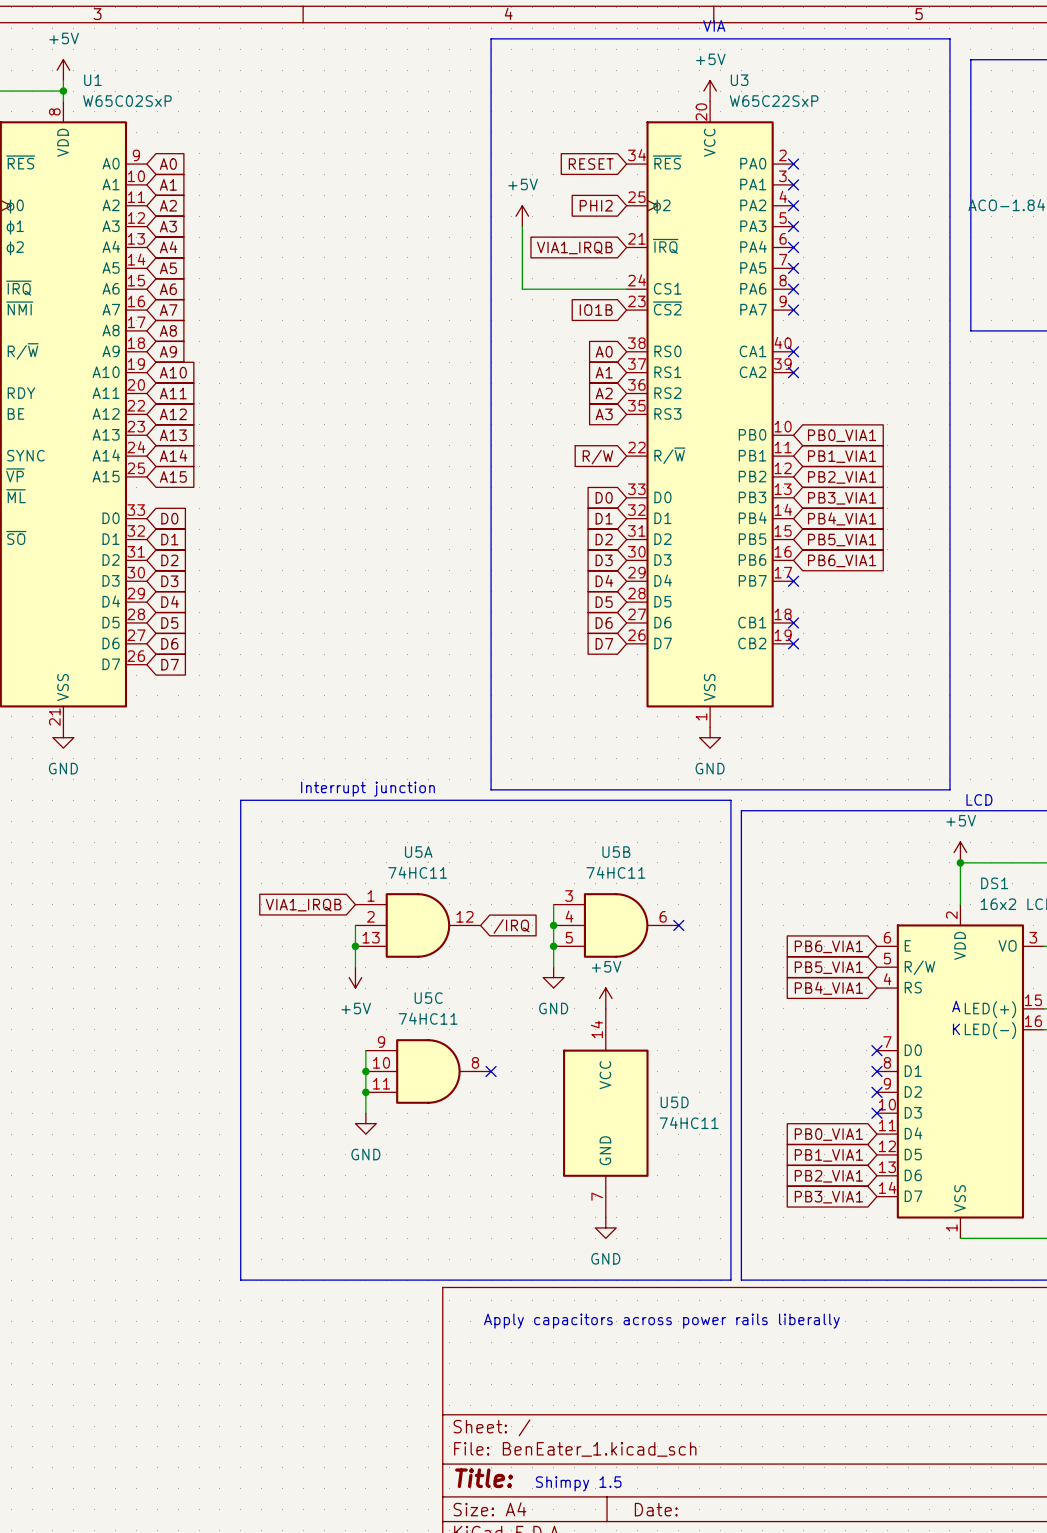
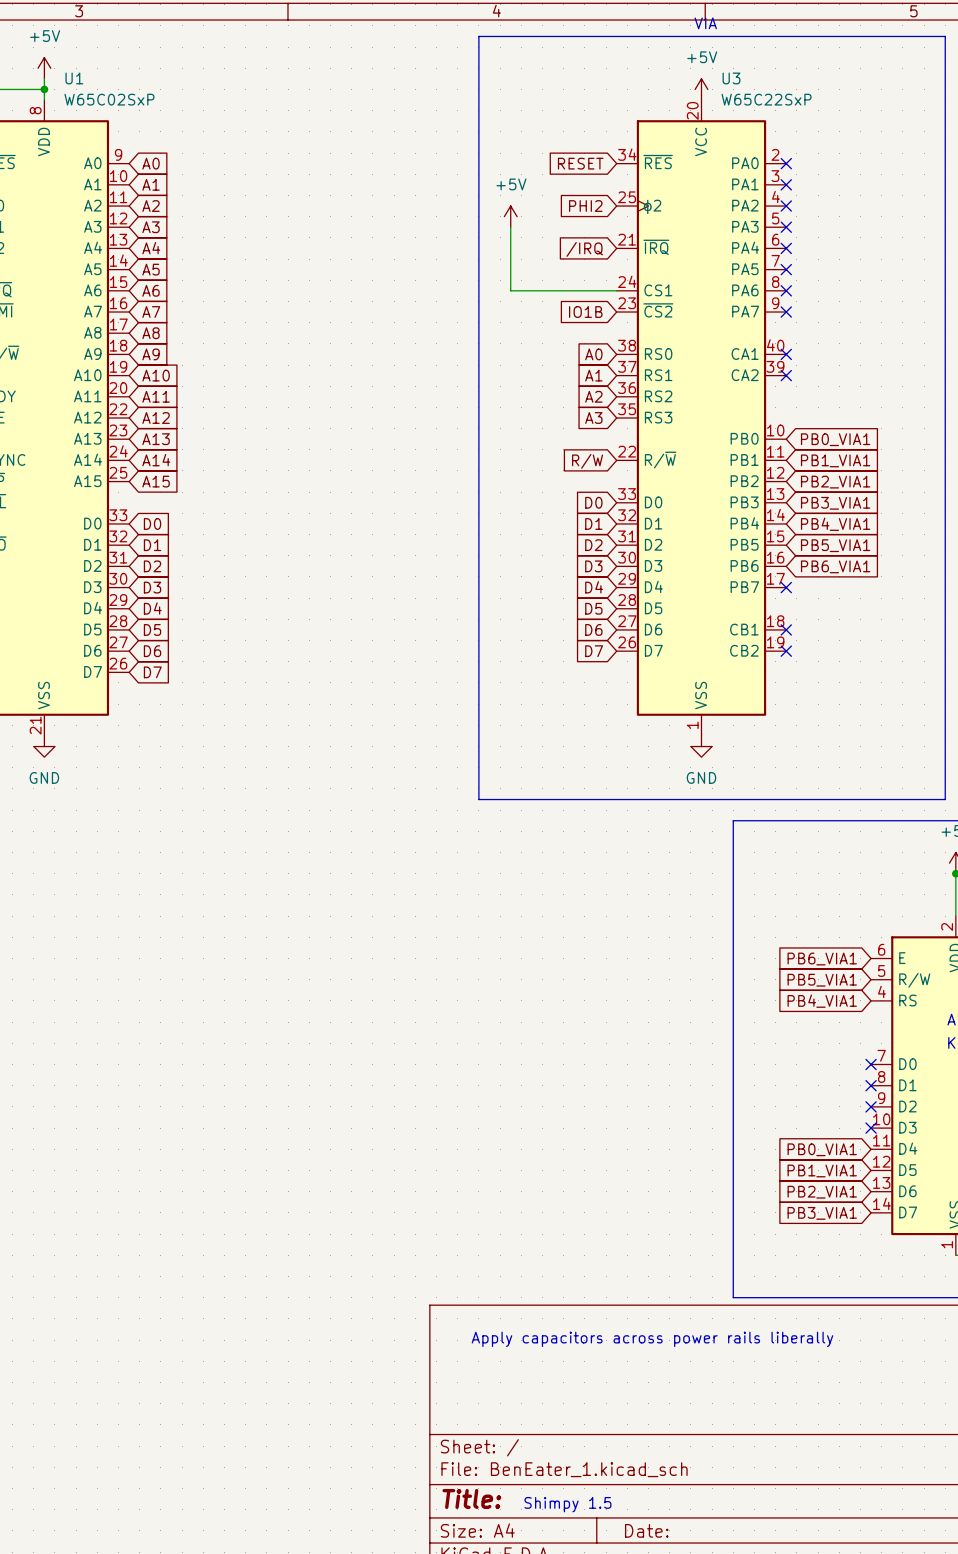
global label: VIA1_IRQB (574, 247) -> /IRQ (584, 249)
text: Interrupt junction (367, 789) -> none
line: (240, 800) (730, 800) (730, 1280) (240, 1280) (240, 800) -> none
wire: (553, 904) (553, 967) -> none
global label: VIA1_IRQB (303, 905) -> none
wire: (355, 925) (355, 967) -> none
U5A: 74HC11 (418, 925) -> none
junction: (553, 925) -> none
U5B: 74HC11 (616, 925) -> none
no-connect mark: (678, 925) -> none
global label: /IRQ (511, 926) -> none
junction: (355, 946) -> none
junction: (553, 946) -> none
power symbol: +5V (355, 977) -> none
power symbol: GND (553, 977) -> none
power symbol: +5V (605, 998) -> none
wire: (365, 1050) (365, 1113) -> none
junction: (365, 1071) -> none
U5C: 74HC11 (428, 1071) -> none
no-connect mark: (491, 1071) -> none
junction: (365, 1092) -> none
U5D: 74HC11 (605, 1113) -> none
power symbol: GND (365, 1123) -> none
power symbol: GND (605, 1227) -> none

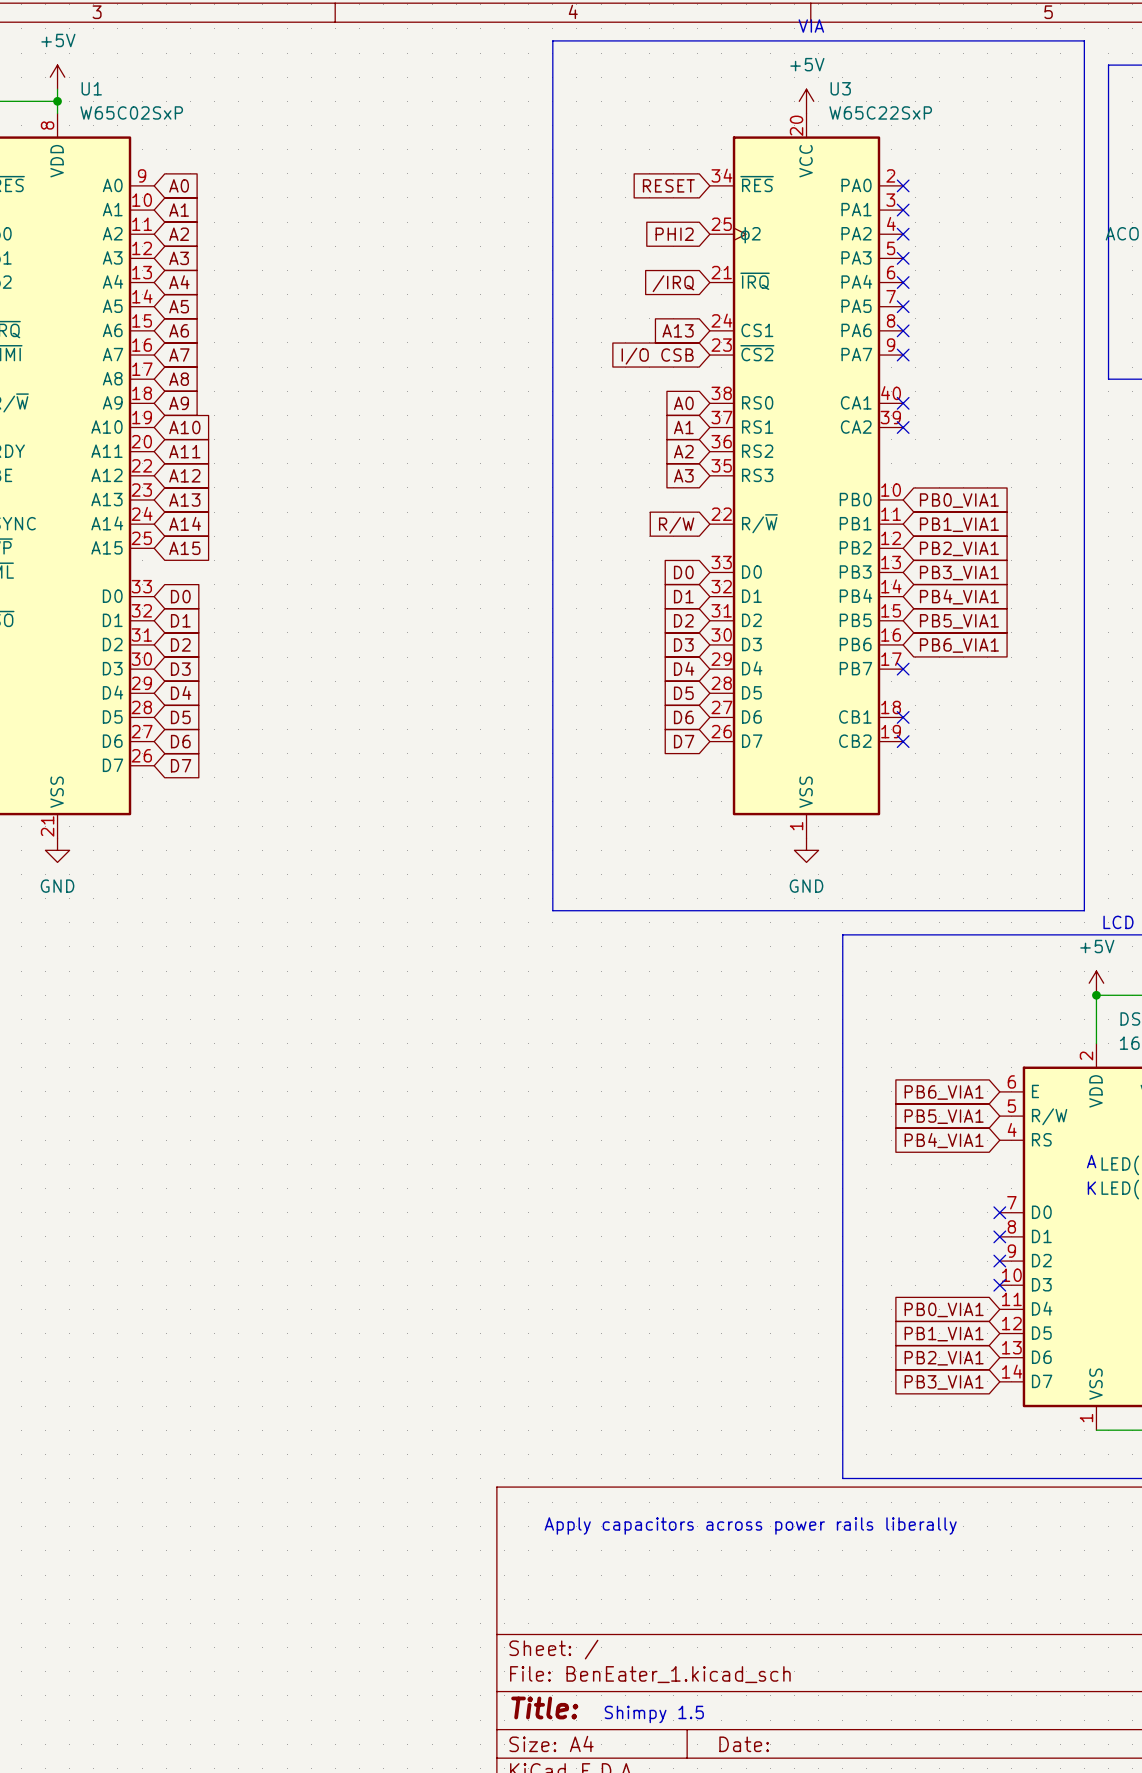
power symbol: +5V (510, 216) -> none
wire: (510, 227) (510, 290) (616, 290) -> none
global label: none -> A13 (678, 330)
global label: IO1B (585, 312) -> I/O CSB (657, 356)

